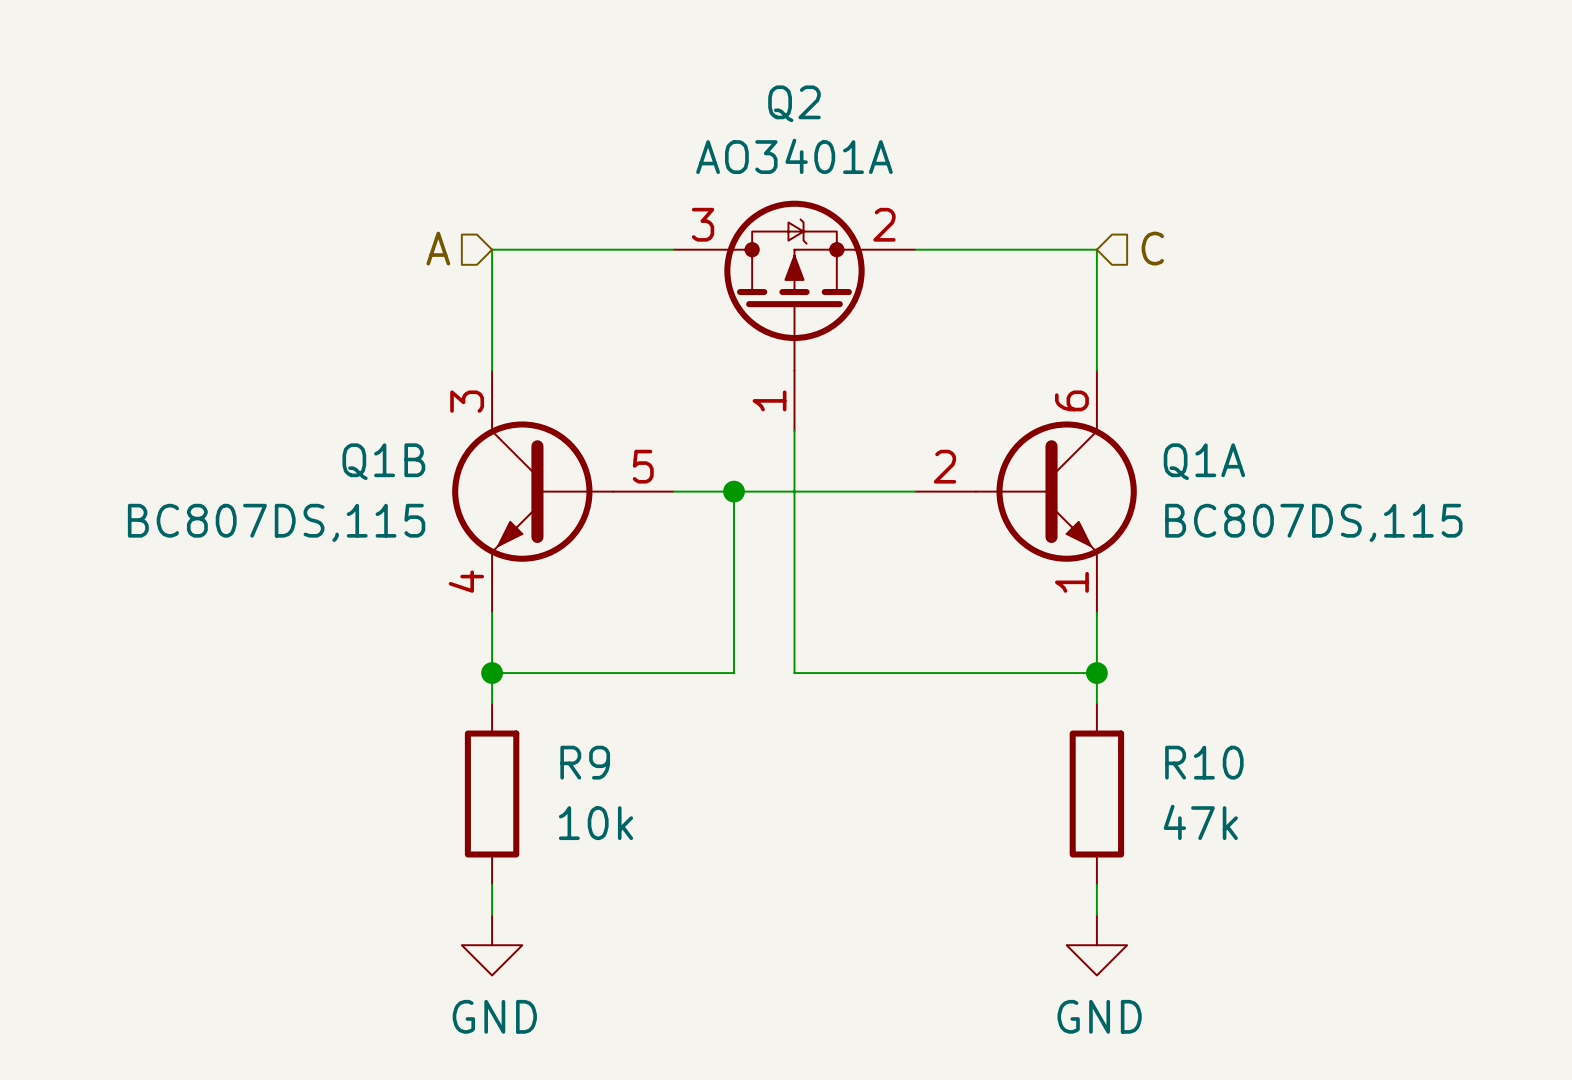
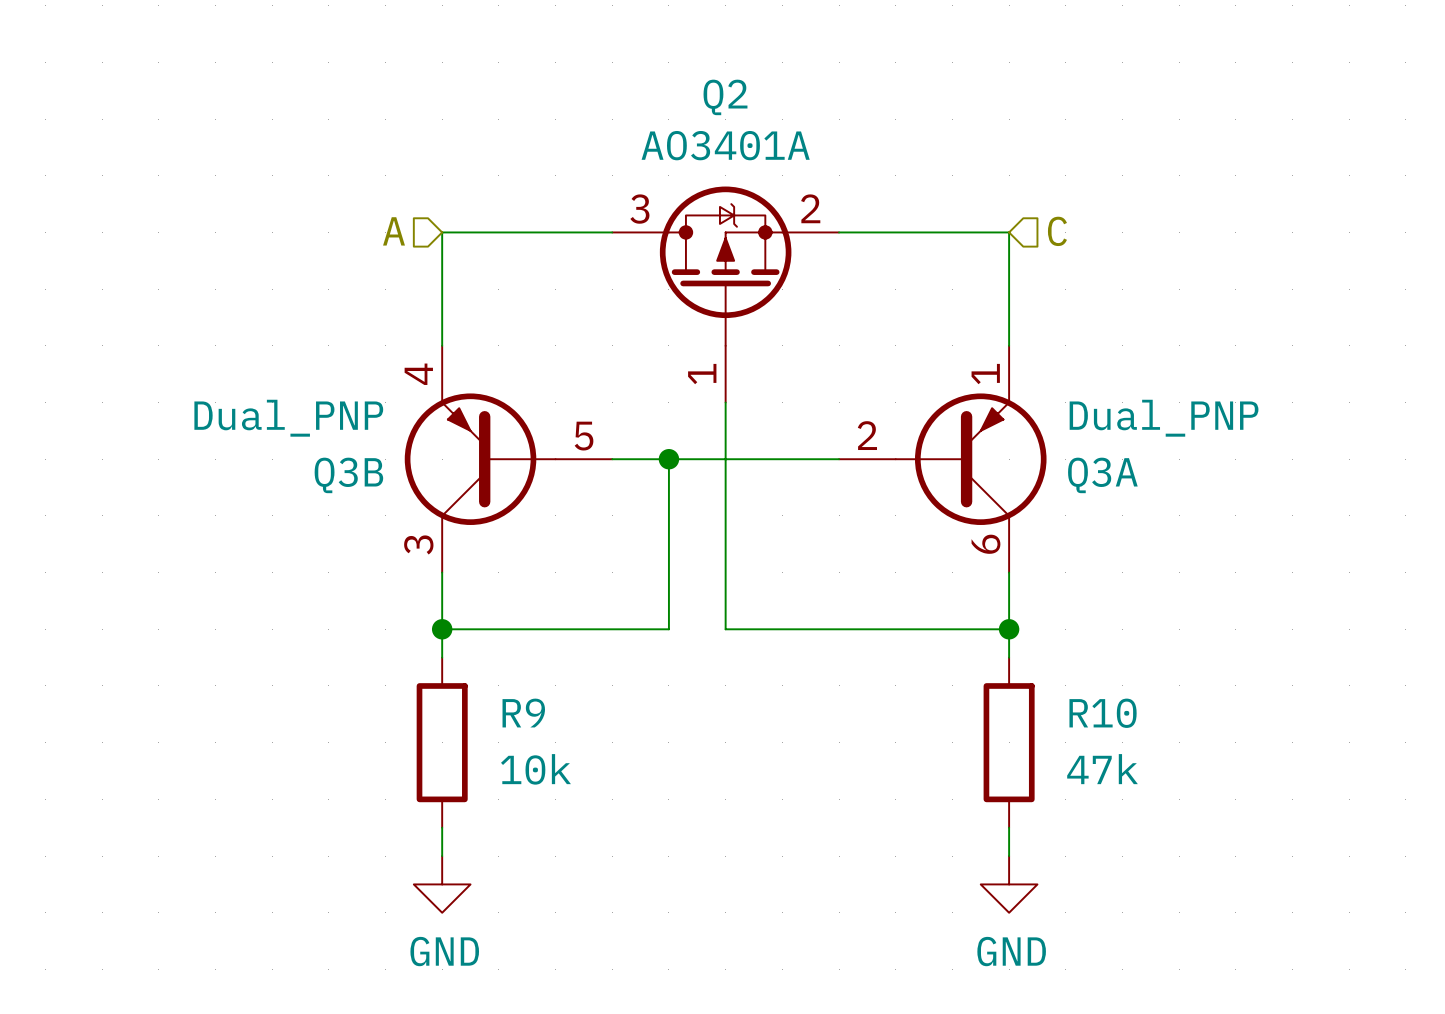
Q1B: BC807DS,115 (562, 491) -> none
Q3B: none -> Dual_PNP (508, 459)
Q1A: BC807DS,115 (1026, 491) -> none
Q3A: none -> Dual_PNP (942, 459)

